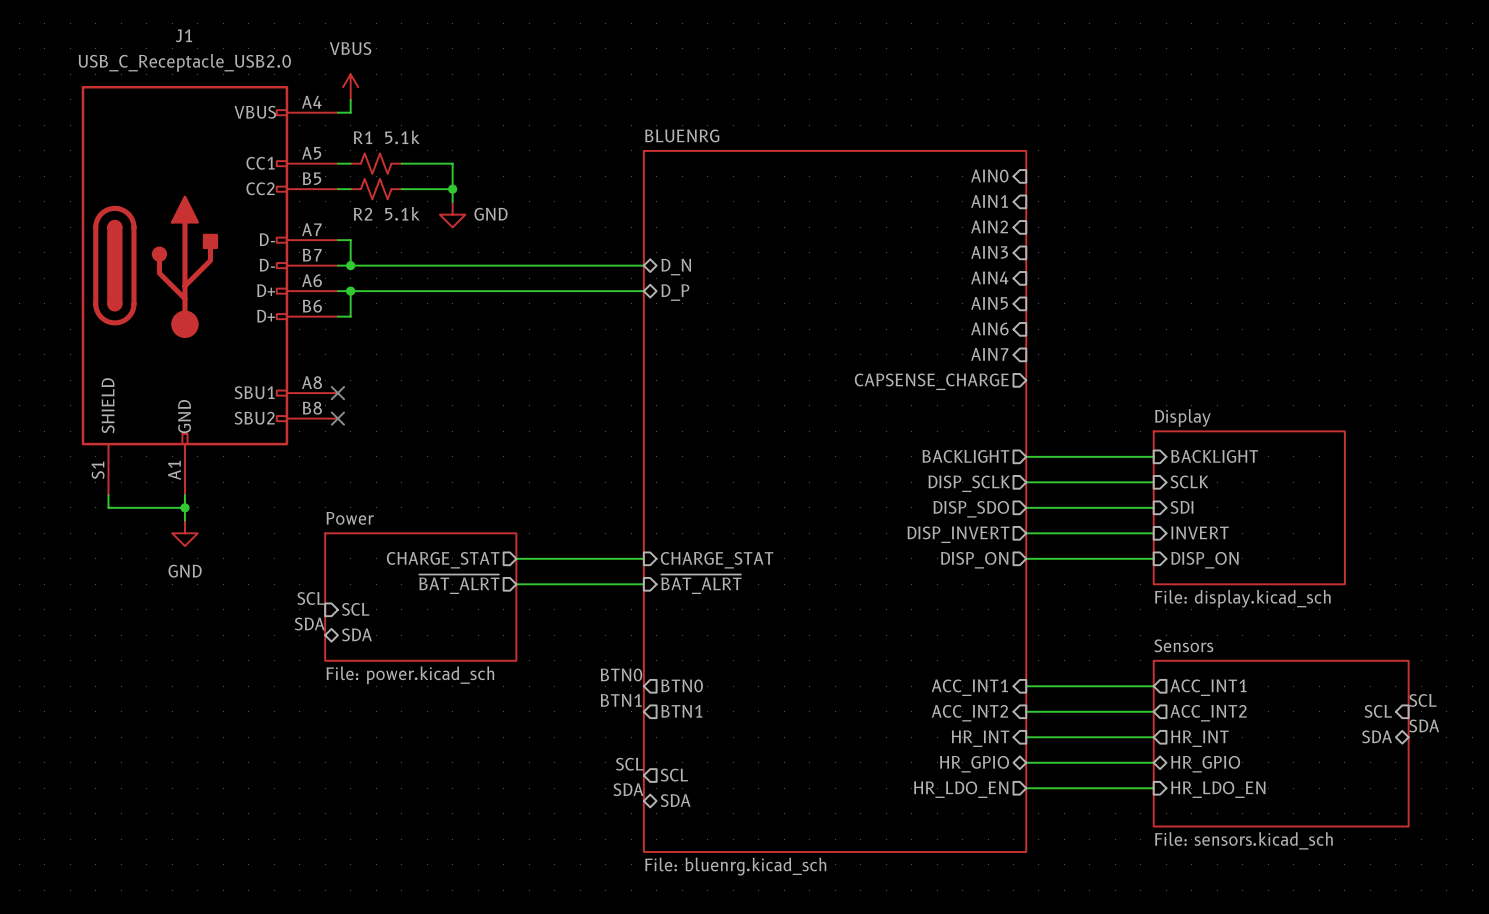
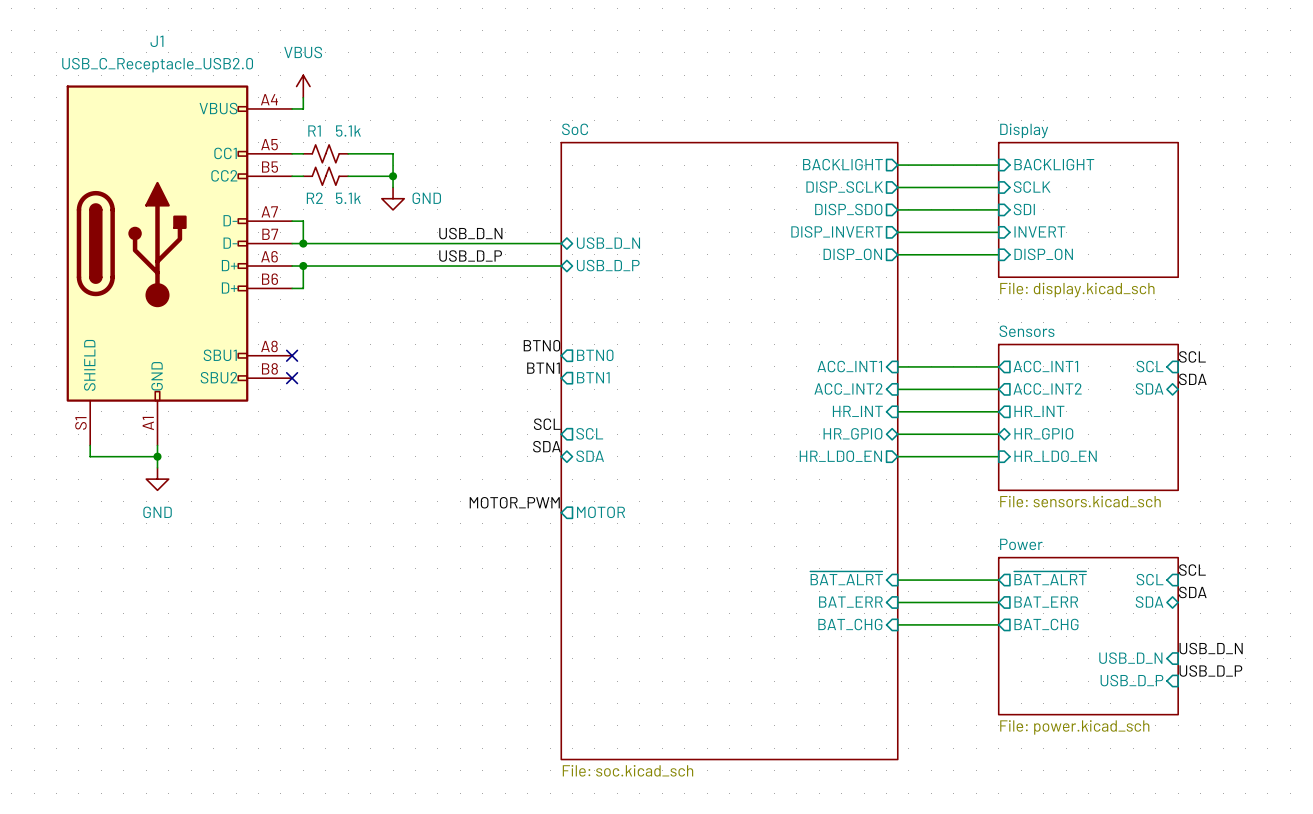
sheet BLUENRG name: BLUENRG (682, 135) -> SoC (575, 129)
sheet pin shape: input (989, 176) -> output (842, 164)
sheet pin: AIN0 (989, 176) -> BACKLIGHT (842, 164)
wire: none -> (897, 165) (998, 165)
sheet pin: none -> BACKLIGHT (1054, 164)
sheet pin shape: input (989, 201) -> output (844, 187)
sheet pin: AIN1 (989, 201) -> DISP_SCLK (844, 187)
wire: none -> (897, 187) (998, 187)
sheet pin: none -> SCLK (1032, 187)
sheet pin shape: input (989, 226) -> output (848, 209)
sheet pin: AIN2 (989, 226) -> DISP_SDO (848, 209)
wire: none -> (897, 209) (998, 209)
sheet pin: none -> SDI (1024, 209)
sheet Display: none -> File: display.kicad_sch (1088, 209)
sheet pin shape: input (989, 252) -> output (837, 231)
sheet pin: AIN3 (989, 252) -> DISP_INVERT (837, 231)
wire: none -> (897, 232) (998, 232)
sheet pin: none -> INVERT (1039, 231)
label: none -> USB_D_N (470, 233)
sheet pin: D_N (676, 267) -> USB_D_N (608, 243)
sheet pin shape: input (989, 277) -> output (852, 254)
sheet pin: AIN4 (989, 277) -> DISP_ON (852, 254)
wire: none -> (897, 254) (998, 254)
sheet pin: none -> DISP_ON (1043, 254)
label: none -> USB_D_P (470, 255)
sheet pin: D_P (675, 292) -> USB_D_P (608, 265)
sheet pin: AIN5 (989, 303) -> none
sheet pin: AIN6 (989, 328) -> none
sheet pin: AIN7 (989, 354) -> none
label: none -> BTN0 (541, 345)
sheet pin: CAPSENSE_CHARGE (931, 381) -> none
sheet pin: none -> BTN0 (595, 355)
label: none -> SCL (1192, 356)
wire: none -> (897, 366) (998, 366)
sheet pin: none -> SCL (1149, 366)
label: none -> BTN1 (543, 368)
sheet pin: none -> ACC_INT1 (849, 366)
sheet pin: none -> ACC_INT1 (1045, 366)
sheet pin: none -> BTN1 (593, 377)
label: none -> SDA (1192, 379)
sheet pin: none -> SDA (1149, 388)
wire: none -> (897, 389) (998, 389)
sheet pin: none -> ACC_INT2 (848, 388)
sheet pin: none -> ACC_INT2 (1047, 388)
sheet pin shape: output (965, 456) -> input (857, 411)
sheet pin: BACKLIGHT (965, 456) -> HR_INT (857, 411)
wire: (1140, 456) (1153, 456) -> none
sheet pin: BACKLIGHT (1214, 456) -> none
sheet pin: none -> HR_INT (1039, 411)
sheet Sensors: none -> File: sensors.kicad_sch (1088, 417)
label: none -> SCL (547, 424)
sheet pin: none -> SCL (589, 433)
sheet pin: SCLK (1189, 481) -> none
wire: (1140, 482) (1153, 482) -> none
sheet pin shape: output (969, 483) -> bidirectional (852, 433)
sheet pin: DISP_SCLK (969, 483) -> HR_GPIO (852, 433)
sheet pin: none -> HR_GPIO (1043, 433)
label: none -> SDA (546, 446)
sheet pin: none -> SDA (590, 456)
wire: (1140, 507) (1153, 507) -> none
sheet pin: SDI (1181, 507) -> none
sheet Display: File: display.kicad_sch (1249, 507) -> none
sheet pin: DISP_SDO (971, 509) -> HR_LDO_EN (840, 456)
sheet pin: none -> HR_LDO_EN (1055, 456)
sheet pin: INVERT (1199, 532) -> none
wire: (1026, 533) (1153, 533) -> none
sheet pin: DISP_INVERT (958, 534) -> none
wire: (516, 558) (643, 558) -> none
wire: (1026, 558) (1153, 558) -> none
sheet pin: CHARGE_STAT (443, 560) -> none
sheet pin: CHARGE_STAT (717, 560) -> none
sheet pin: DISP_ON (974, 560) -> none
sheet pin: DISP_ON (1204, 560) -> none
label: none -> MOTOR_PWM (514, 502)
sheet pin: none -> MOTOR (601, 512)
sheet pin: ~{BAT_ALRT} (459, 584) -> none
wire: (516, 584) (643, 584) -> none
sheet pin: ~{BAT_ALRT} (701, 584) -> none
sheet Power: File: power.kicad_sch (420, 597) -> none
label: SCL (311, 598) -> none
sheet pin: SCL (355, 609) -> none
label: SDA (309, 623) -> none
sheet pin: SDA (356, 634) -> none
sheet pin: none -> ~{BAT_ALRT} (846, 578)
wire: none -> (897, 580) (998, 580)
sheet pin: none -> ~{BAT_ALRT} (1050, 578)
wire: none -> (897, 602) (998, 602)
label: BTN0 (621, 674) -> none
sheet pin: none -> BAT_ERR (850, 602)
sheet pin: none -> BAT_ERR (1046, 602)
sheet pin: BTN0 (682, 685) -> none
wire: (1026, 686) (1153, 686) -> none
sheet pin: ACC_INT1 (969, 687) -> none
sheet pin: ACC_INT1 (1208, 687) -> none
wire: none -> (897, 624) (998, 624)
label: BTN1 (621, 700) -> none
sheet pin: none -> BAT_CHG (850, 624)
sheet pin: none -> BAT_CHG (1046, 624)
label position: SCL (1422, 700) -> SCL (1192, 570)
sheet pin: BTN1 (681, 711) -> none
wire: (1026, 711) (1153, 711) -> none
sheet Power: none -> File: power.kicad_sch (1088, 636)
sheet pin position: SCL (1378, 711) -> SCL (1149, 579)
sheet pin: ACC_INT2 (969, 713) -> none
sheet pin: ACC_INT2 (1208, 713) -> none
label position: SDA (1424, 725) -> SDA (1192, 592)
label: none -> USB_D_N (1211, 648)
sheet pin position: SDA (1377, 736) -> SDA (1149, 602)
wire: (1026, 737) (1153, 737) -> none
sheet pin: HR_INT (980, 738) -> none
sheet pin: HR_INT (1199, 738) -> none
sheet pin: none -> USB_D_N (1130, 658)
sheet Sensors: File: sensors.kicad_sch (1281, 743) -> none
label: none -> USB_D_P (1210, 670)
wire: (1026, 762) (1153, 762) -> none
label: SCL (629, 764) -> none
sheet pin: HR_GPIO (974, 764) -> none
sheet pin: HR_GPIO (1205, 764) -> none
sheet pin: none -> USB_D_P (1131, 680)
sheet pin: SCL (674, 775) -> none
wire: (1026, 788) (1153, 788) -> none
label: SDA (628, 789) -> none
sheet pin: HR_LDO_EN (961, 789) -> none
sheet pin: HR_LDO_EN (1218, 789) -> none
sheet pin: SDA (675, 800) -> none
sheet BLUENRG value: File: bluenrg.kicad_sch (735, 866) -> File: soc.kicad_sch (627, 770)

